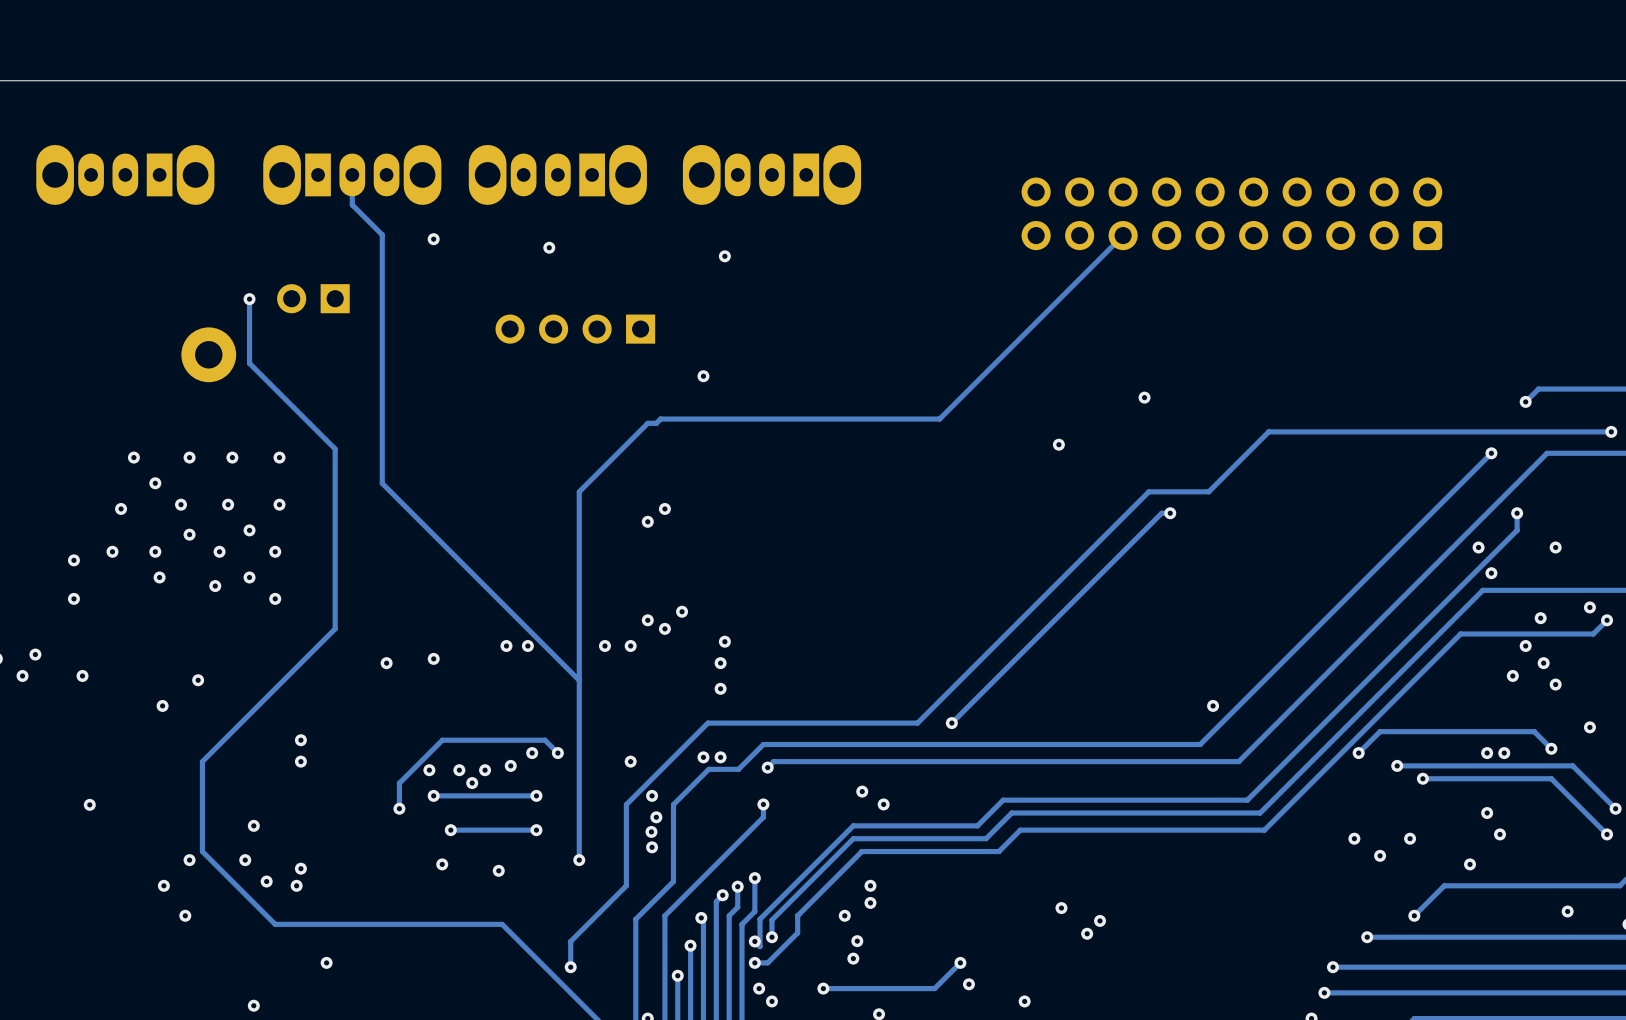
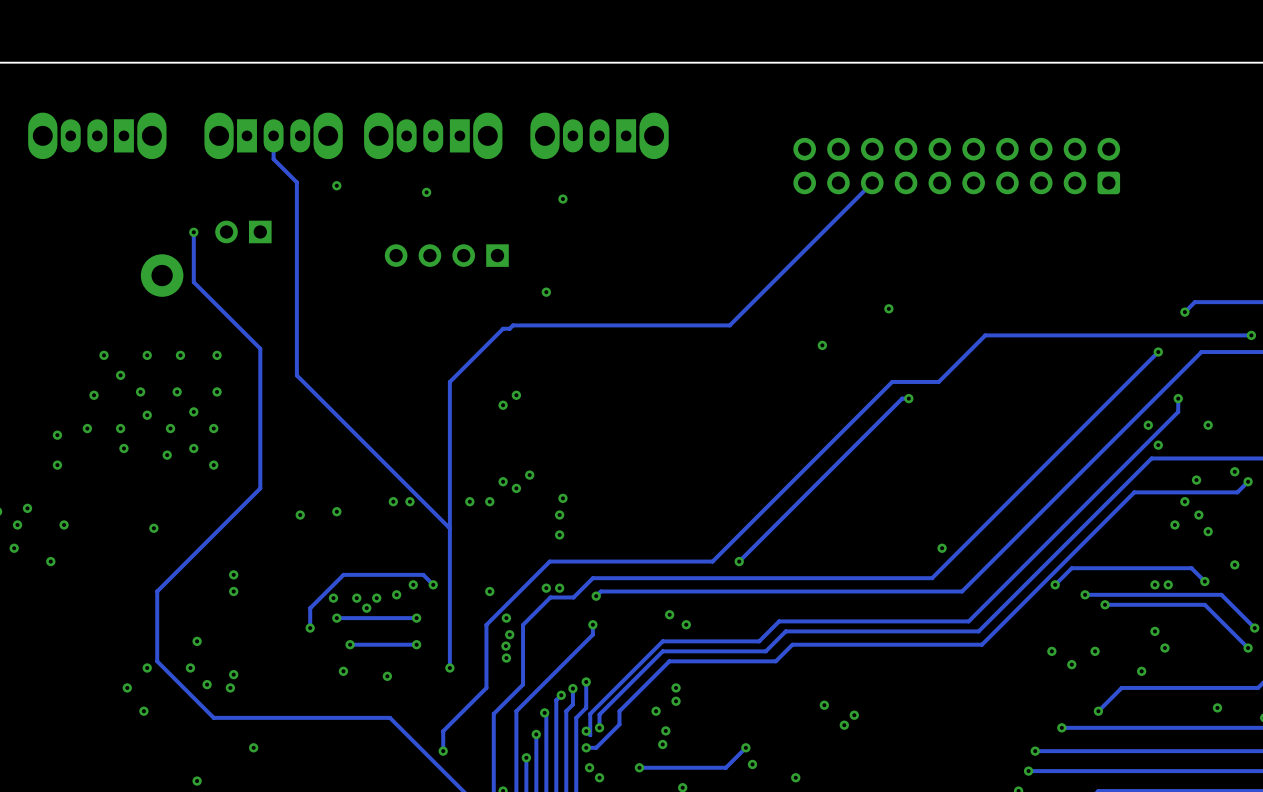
via: none -> (14, 548)
via: (162, 705) -> none
via: none -> (50, 561)
via: (89, 804) -> none

